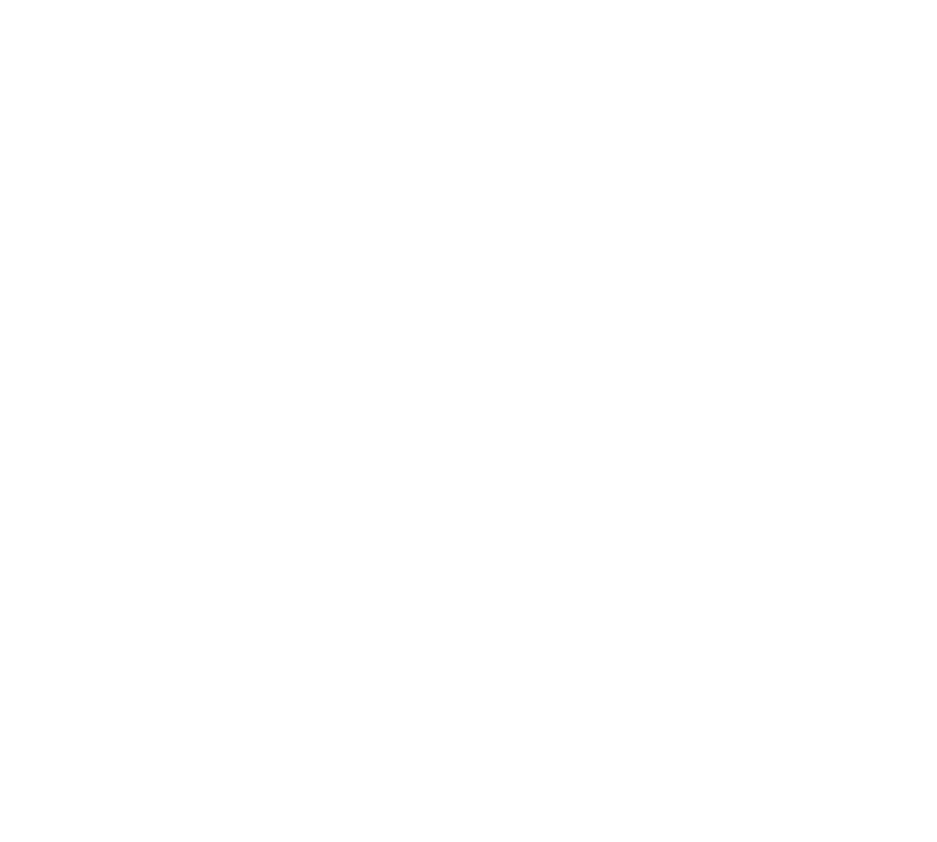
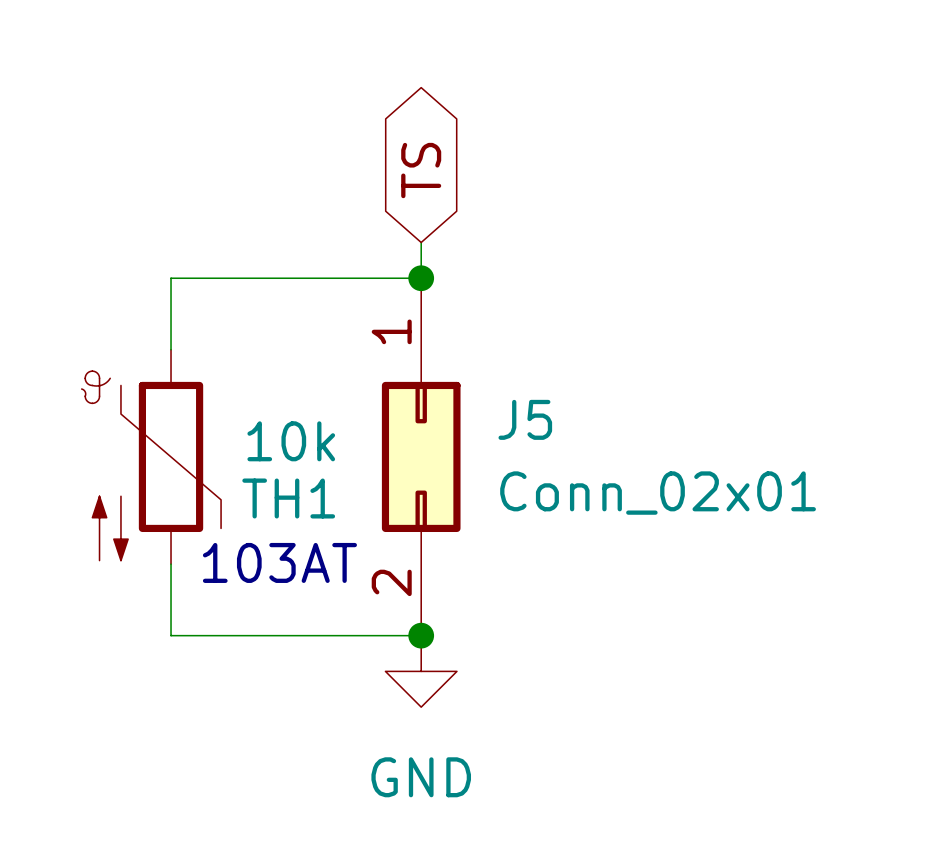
global label: none -> TS (421, 170)
wire: none -> (421, 242) (421, 278) (171, 278) (171, 349)
junction: none -> (421, 278)
TH1: none -> 10k (151, 456)
J5: none -> Conn_02x01 (421, 456)
text: none -> 103AT (279, 562)
wire: none -> (171, 564) (171, 635) (421, 635)
junction: none -> (421, 635)
power symbol: none -> GND (421, 671)

